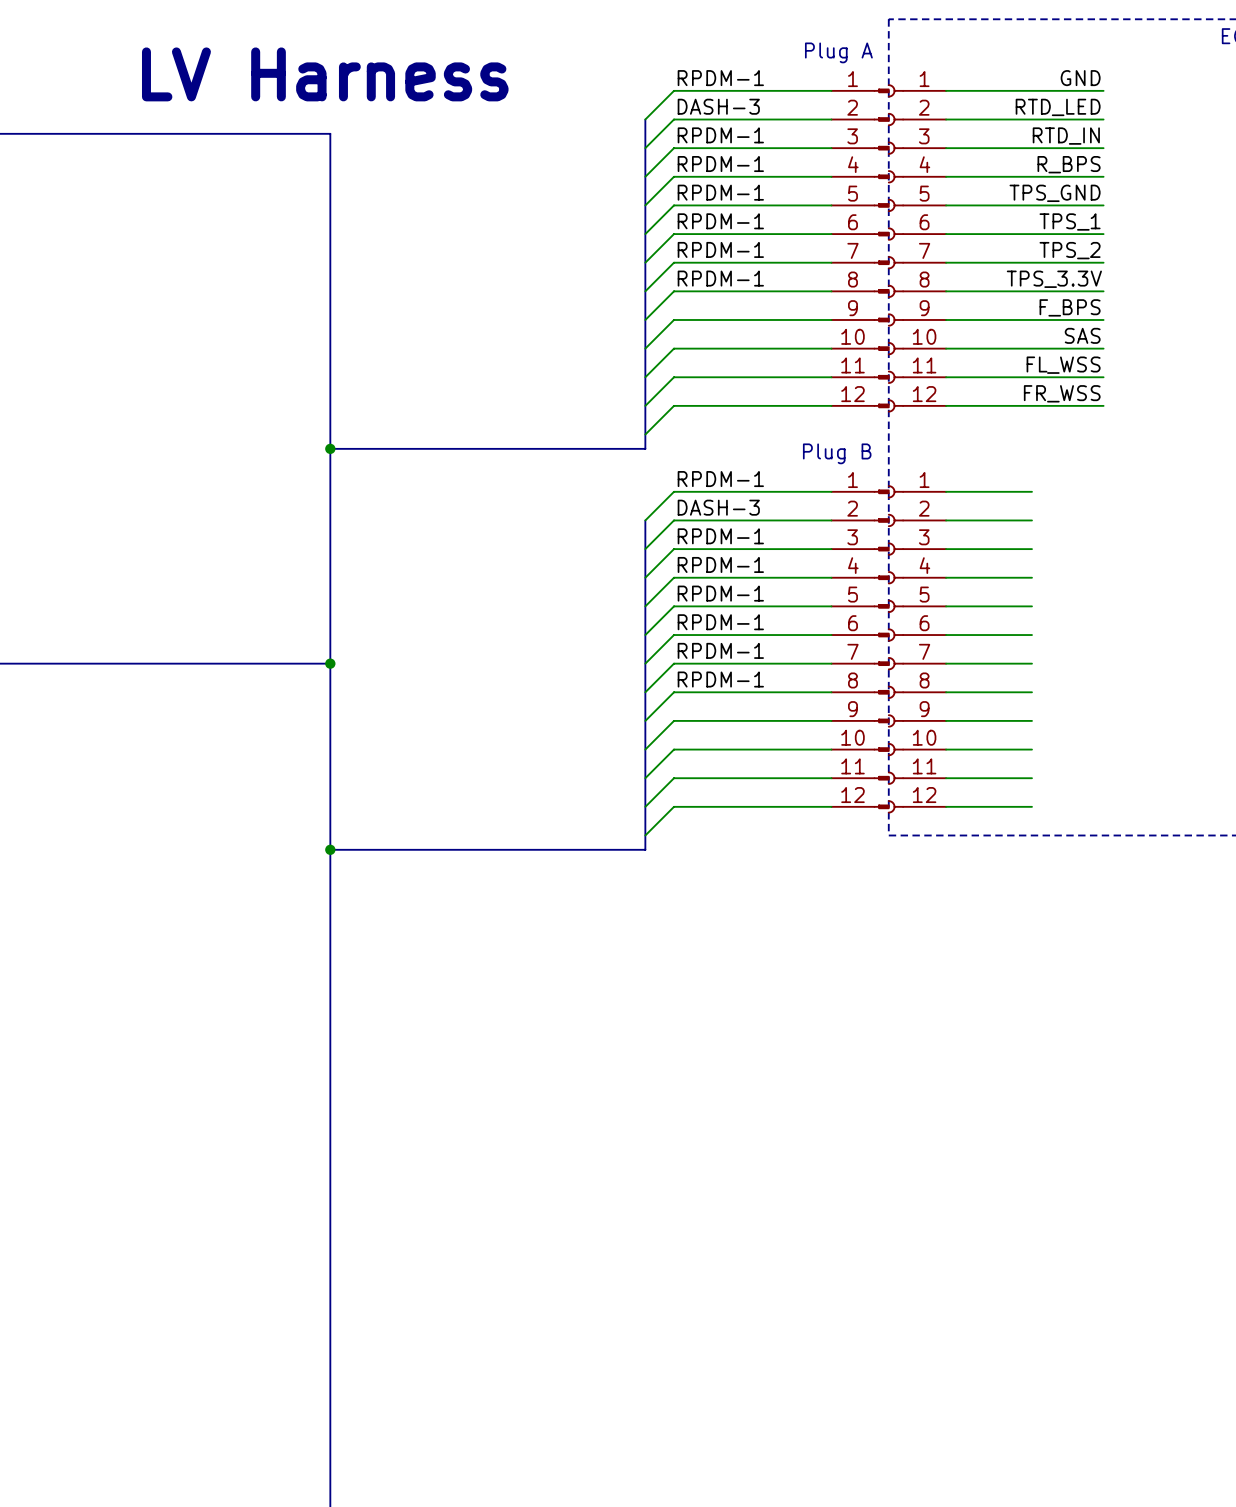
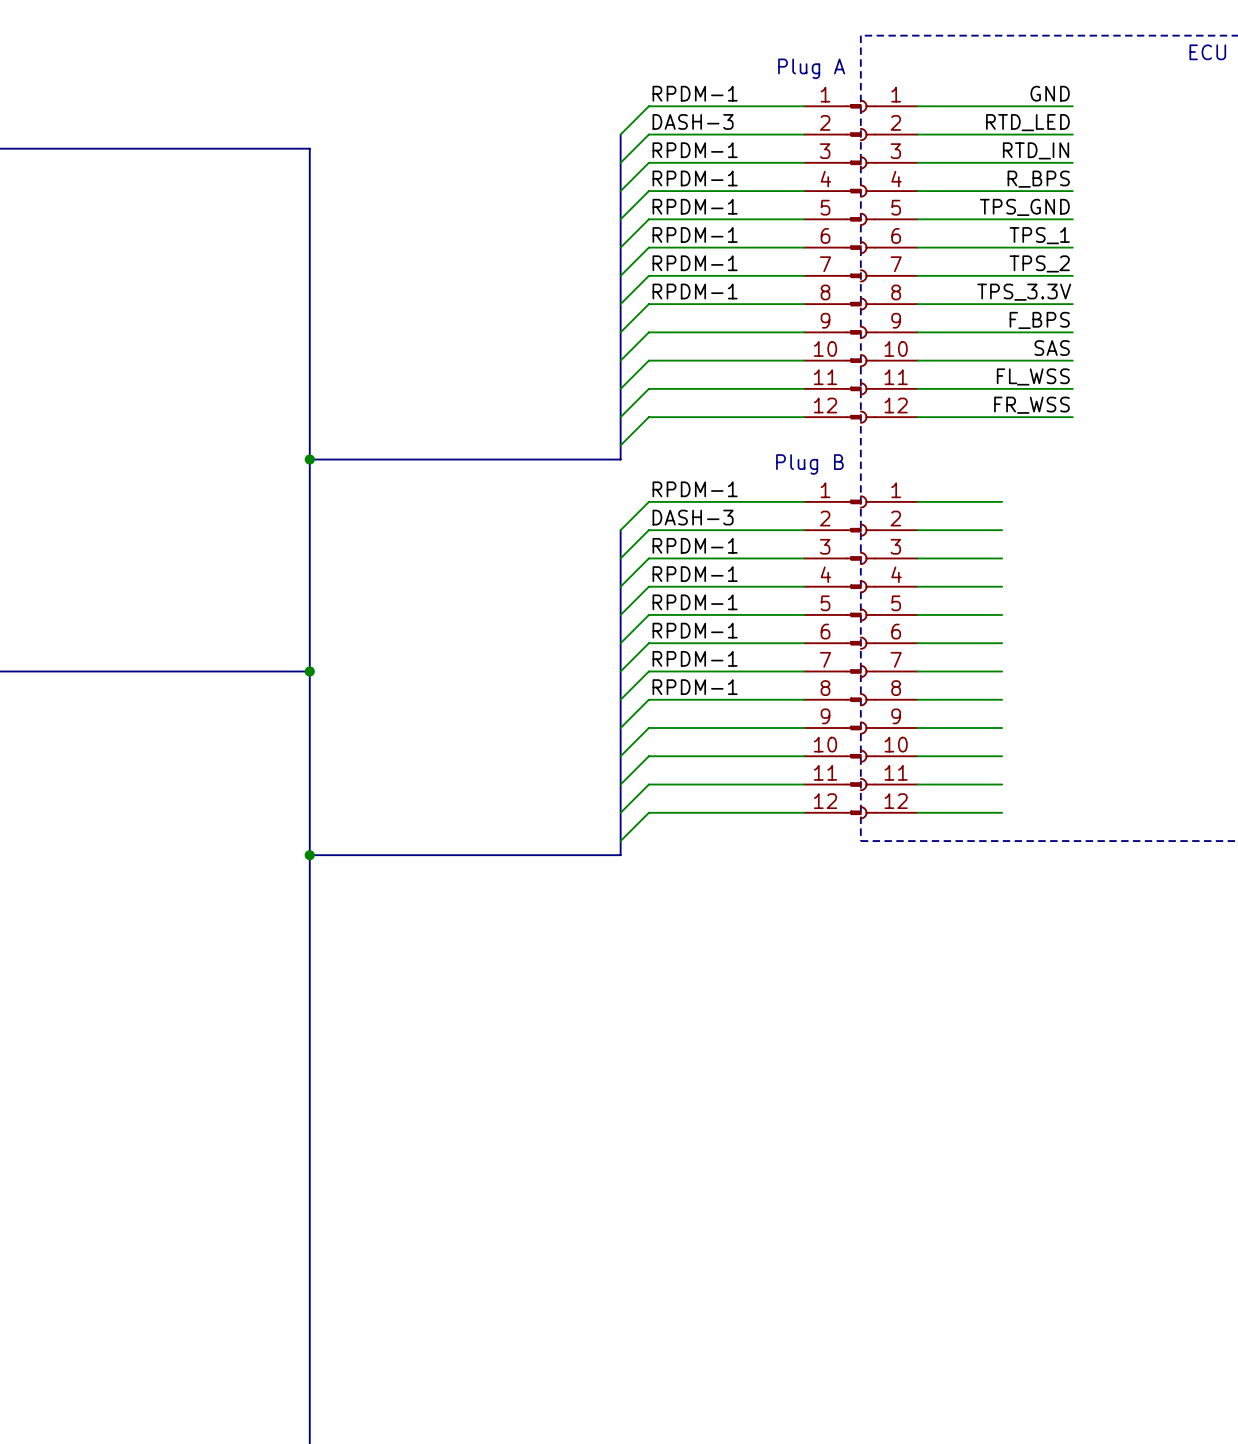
text: LV Harness (325, 74) -> none

